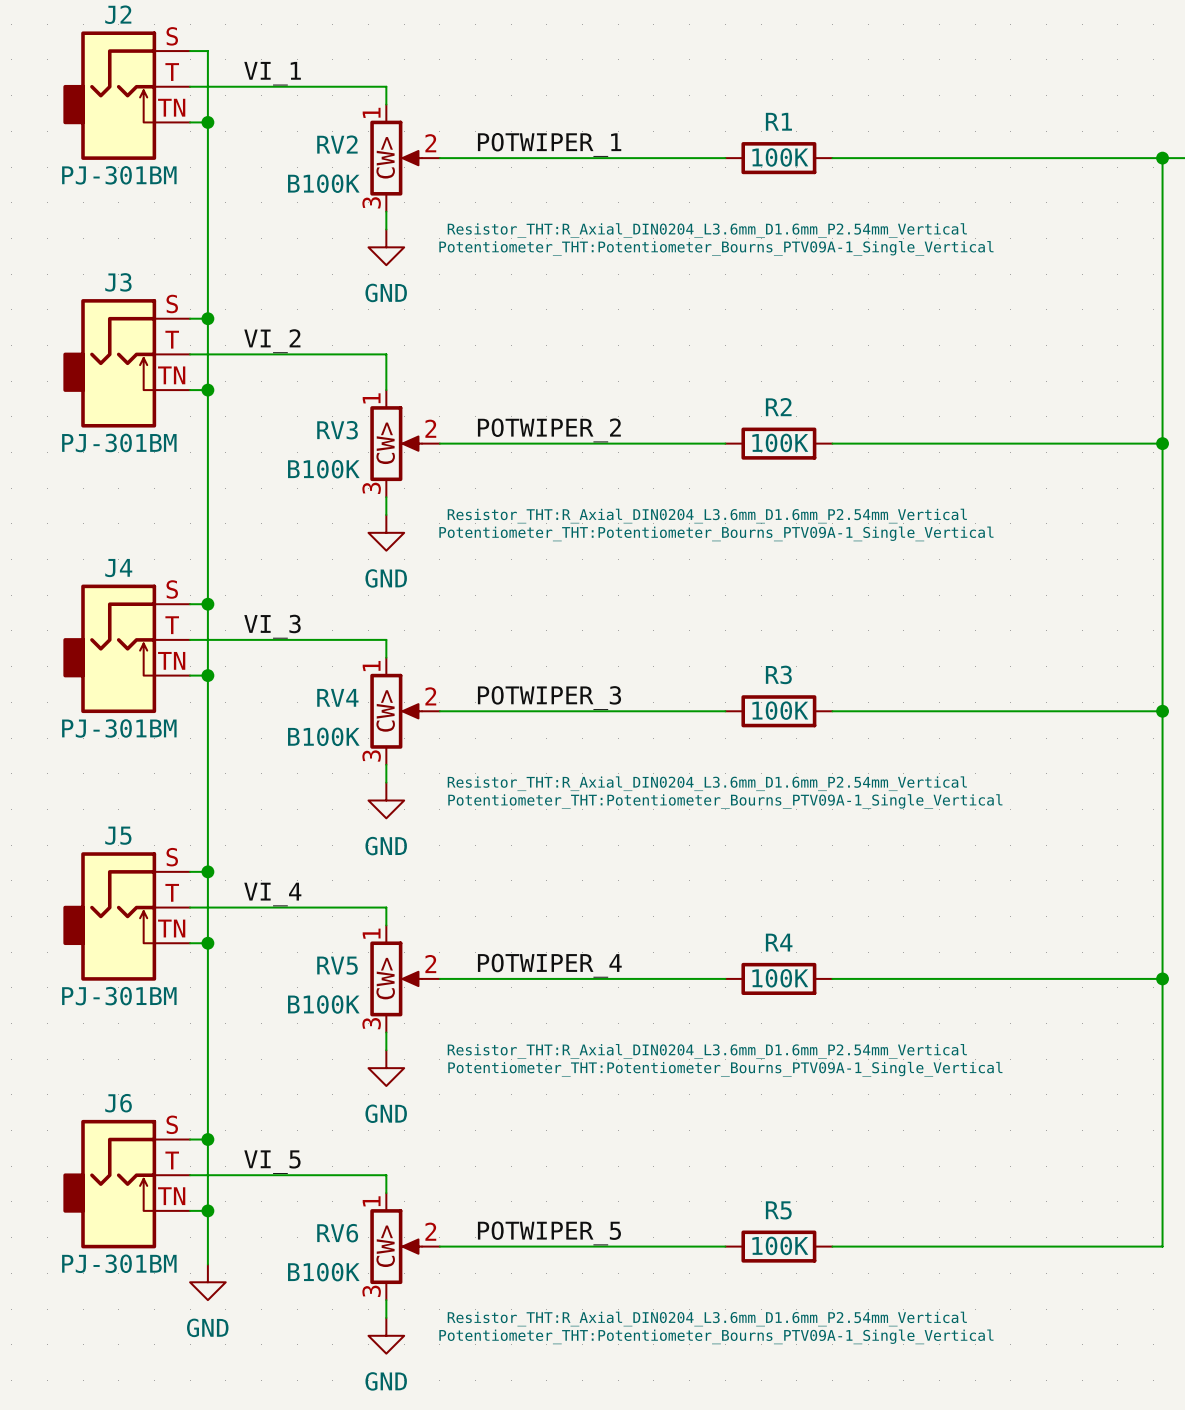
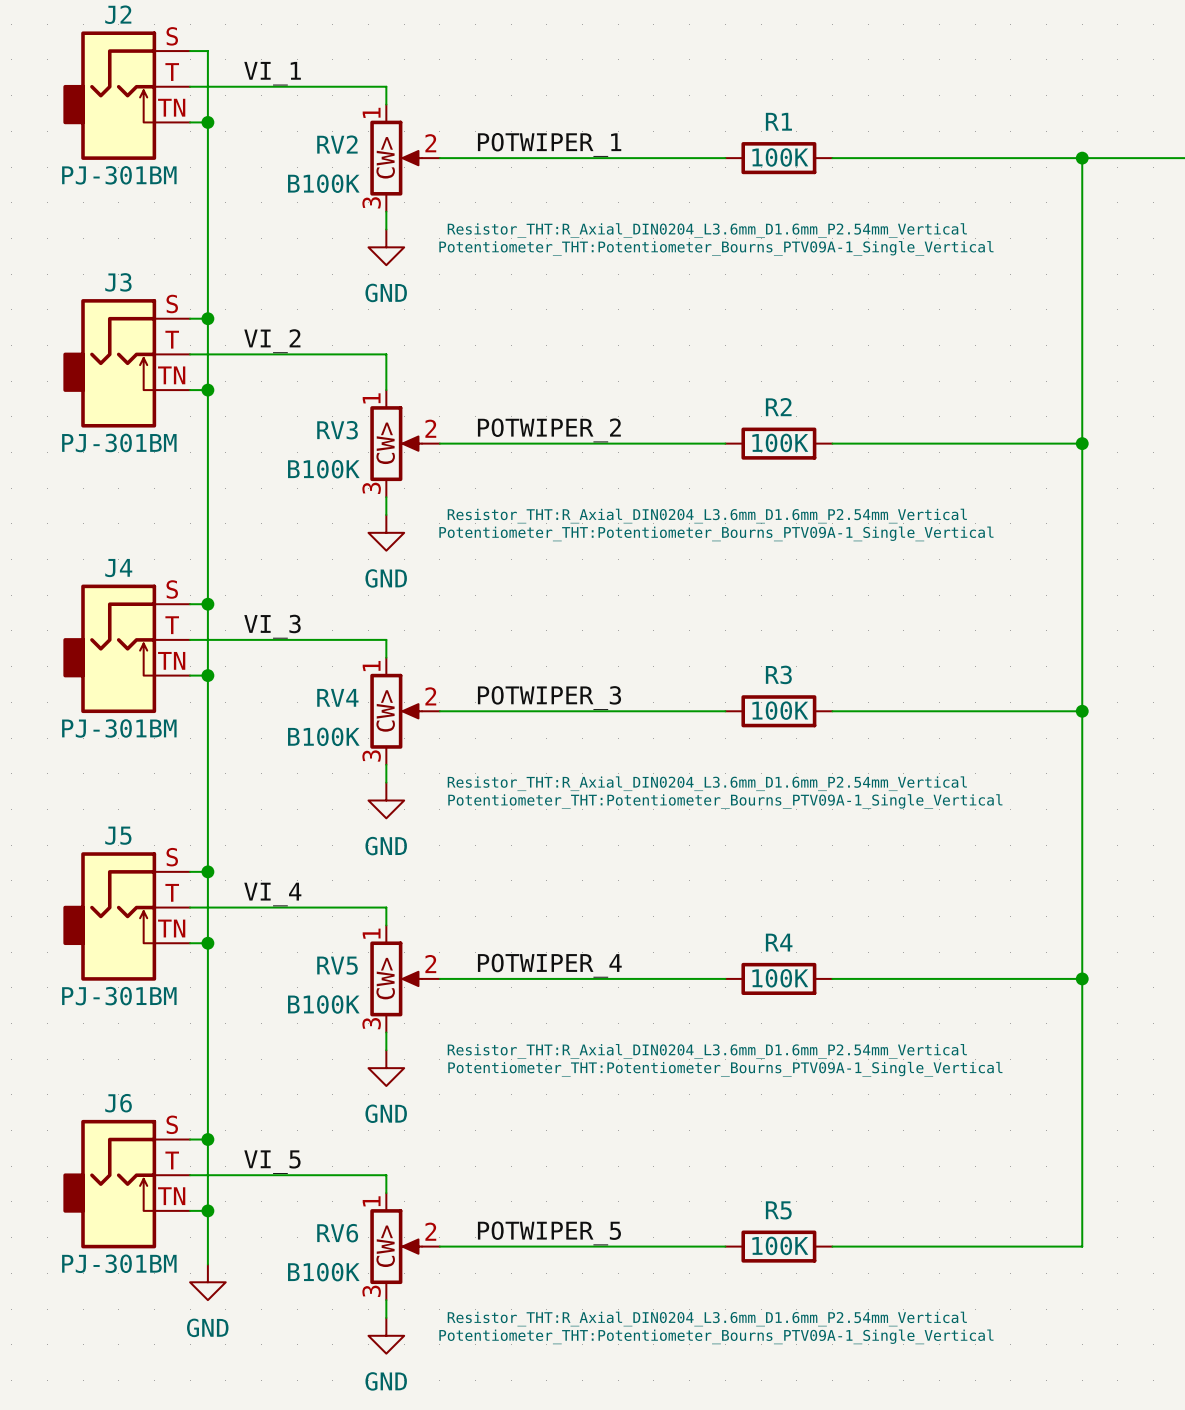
wire: (1162, 158) (1162, 1246) (1082, 1246) -> (1082, 158) (1082, 1246)
junction position: (1162, 158) -> (1082, 158)
wire: (1082, 443) (1162, 443) -> none
junction position: (1162, 443) -> (1082, 443)
wire: (1082, 711) (1162, 711) -> none
junction position: (1162, 711) -> (1082, 711)
wire: (1082, 978) (1162, 978) -> none
junction position: (1162, 978) -> (1082, 978)

